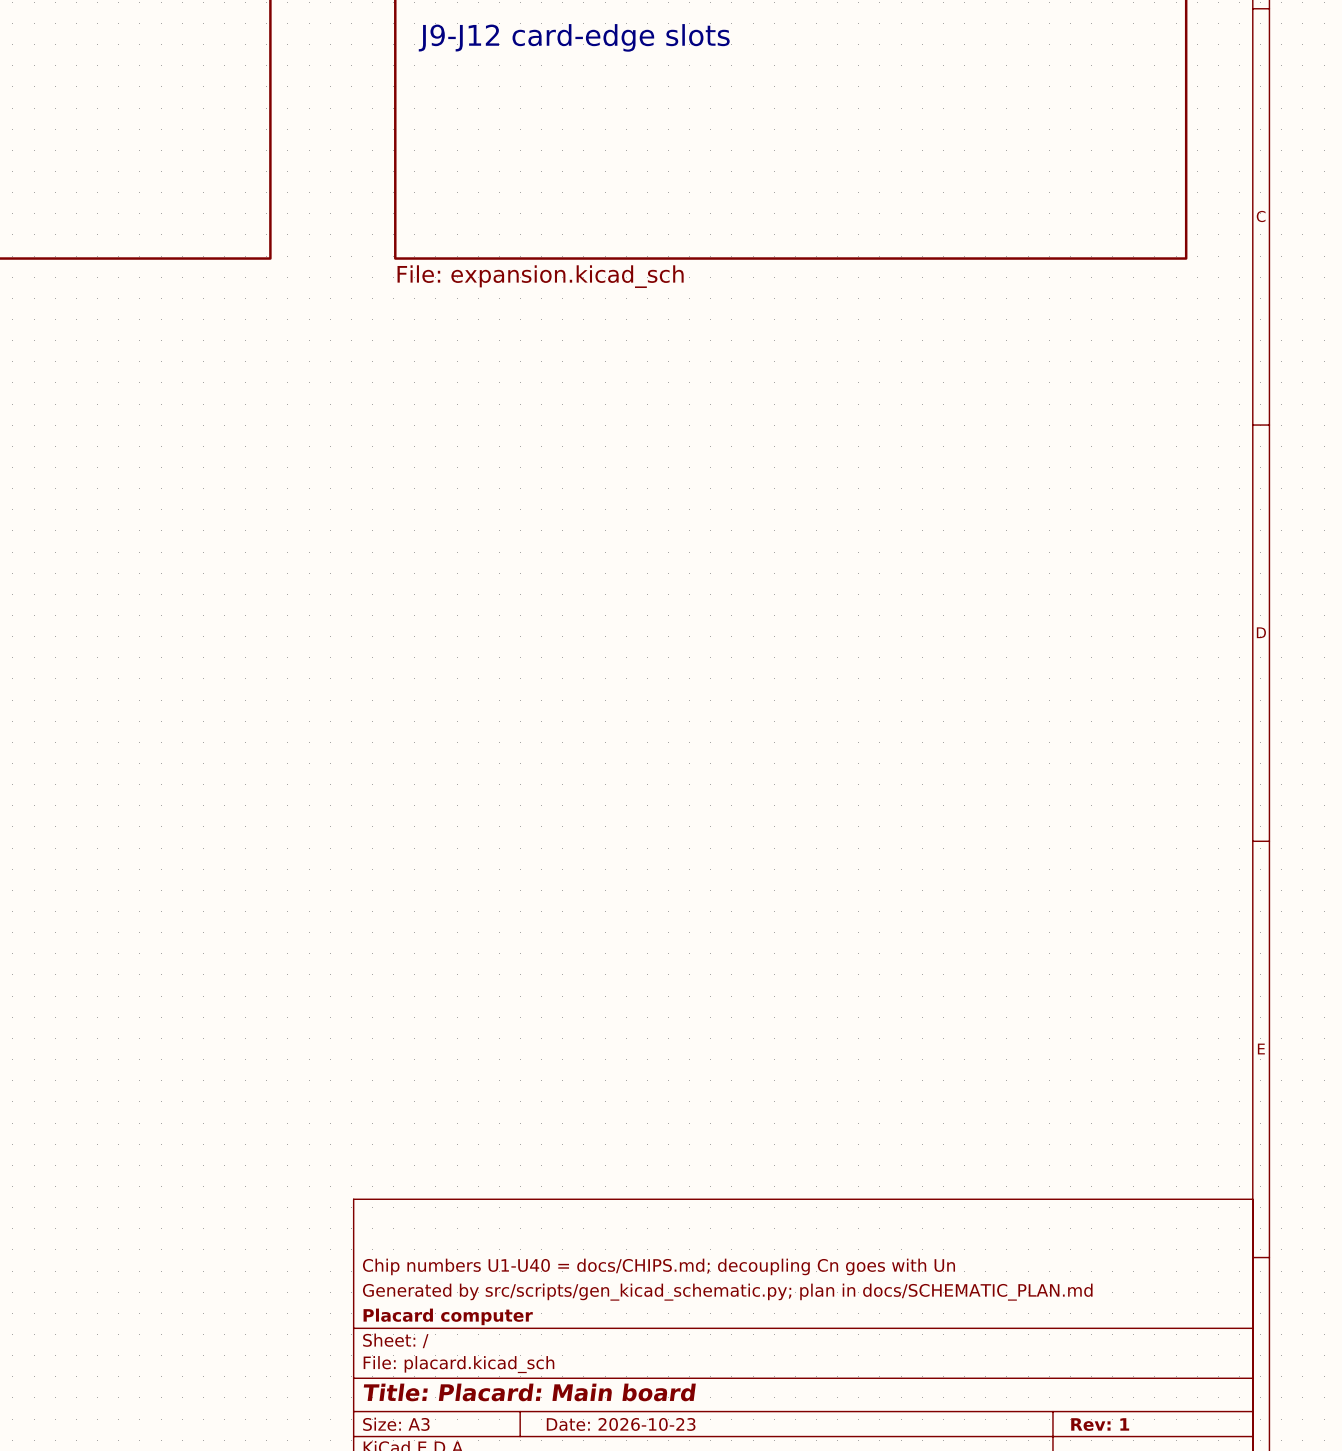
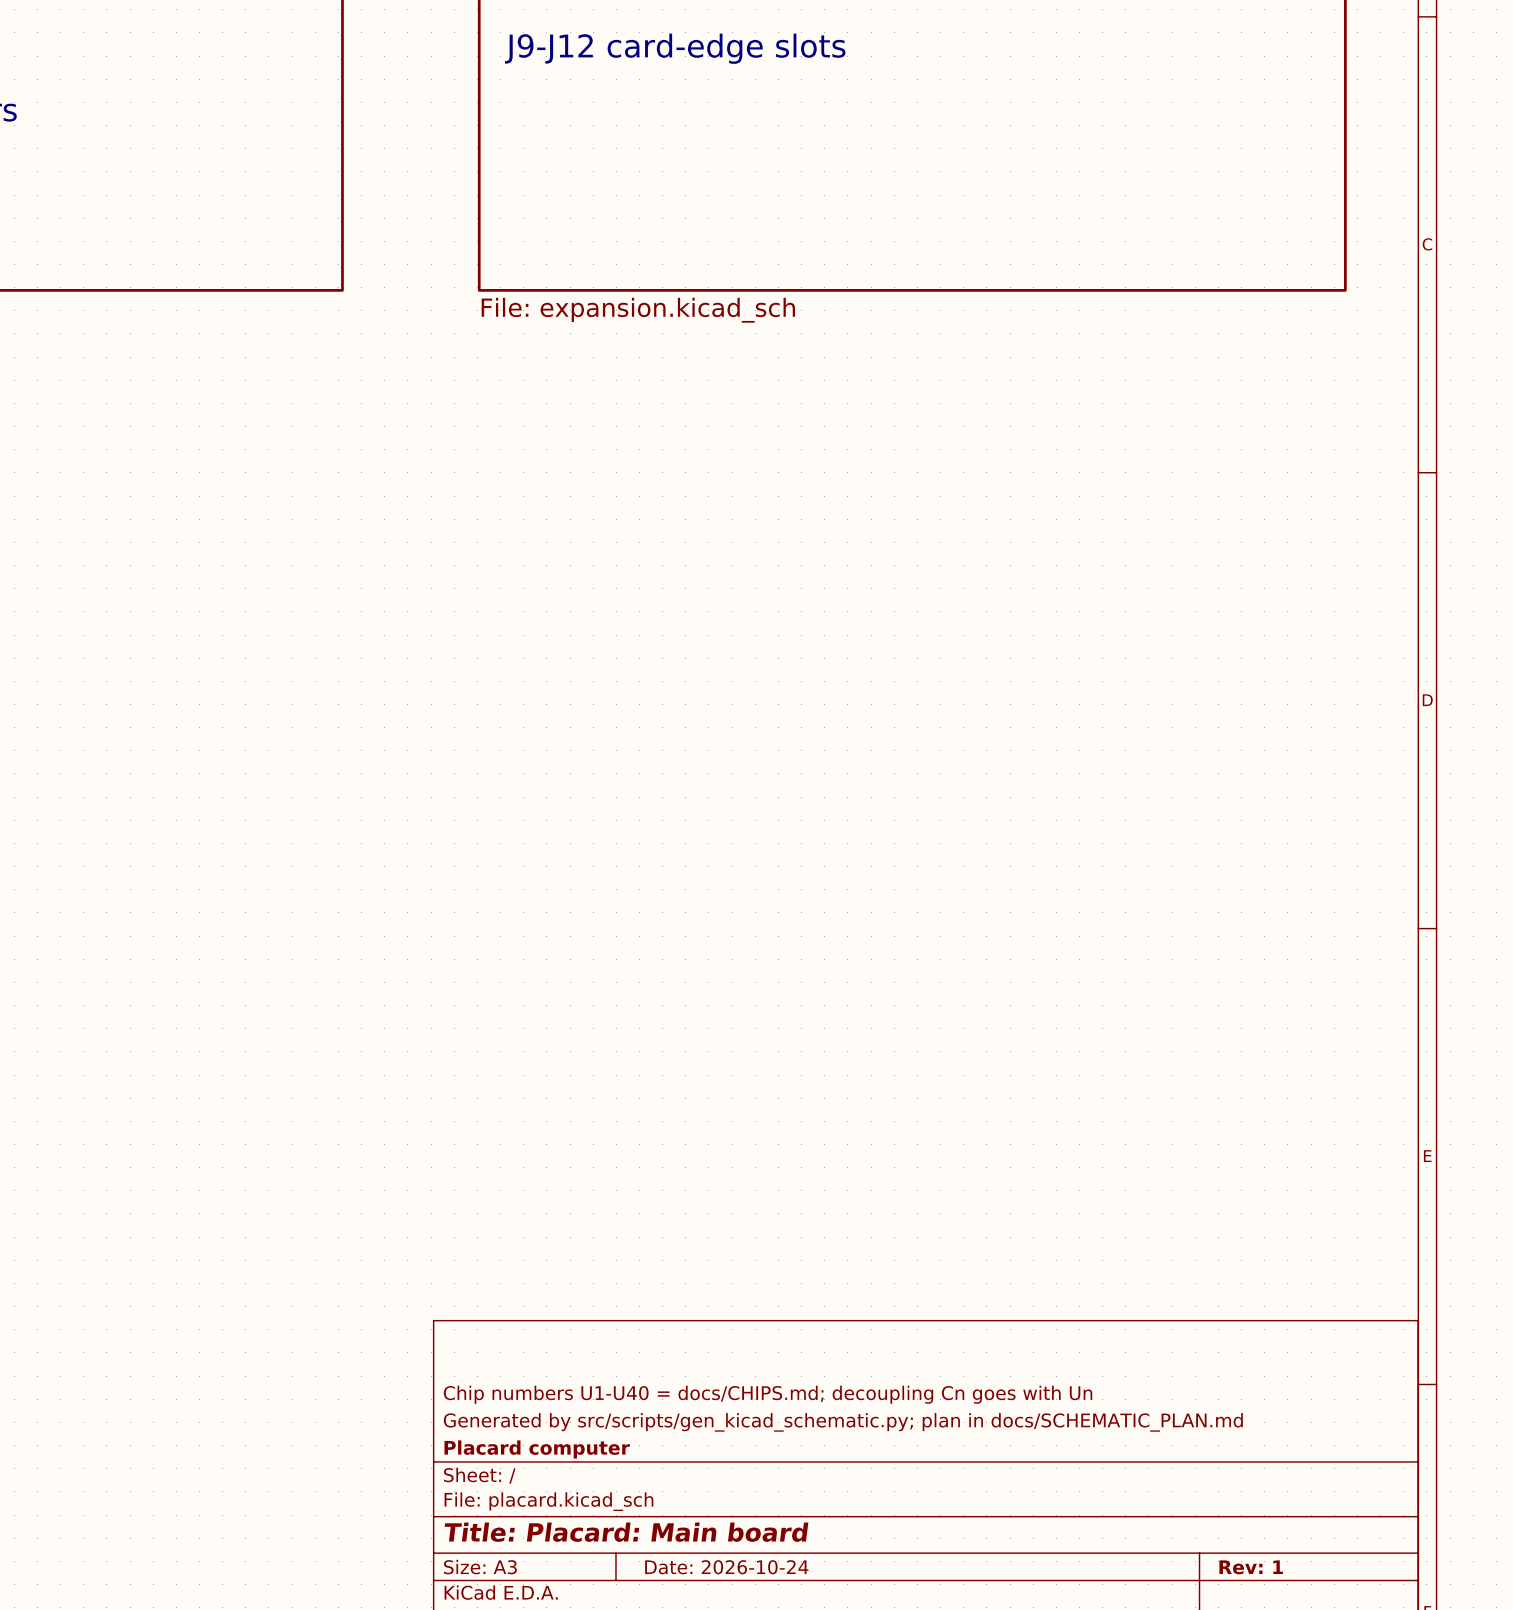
title block: Date: 2026-10-23 (621, 1424) -> Date: 2026-10-24 (726, 1567)

